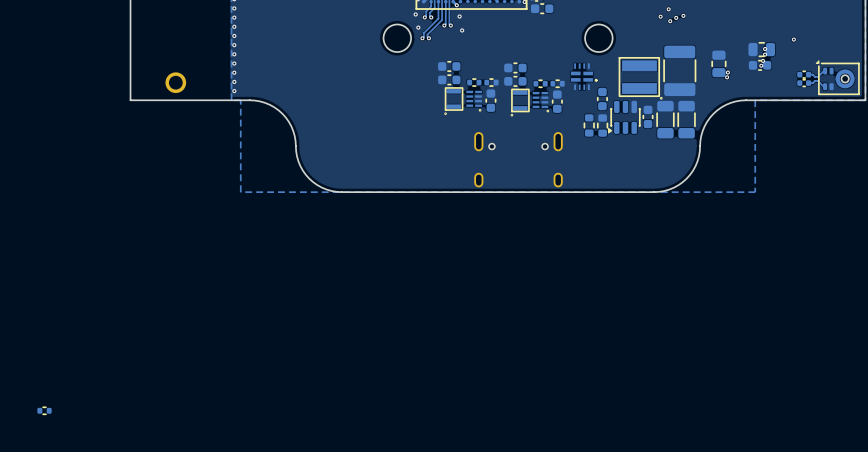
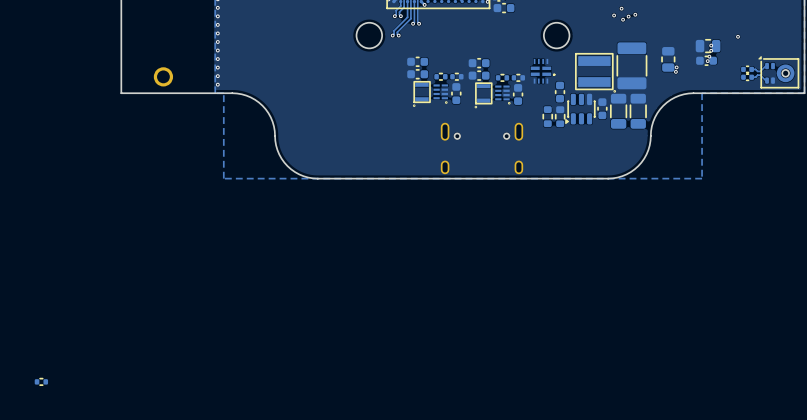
via: (415, 14) -> none
via: (459, 16) -> none
via: (418, 27) -> none
via: (462, 30) -> none

